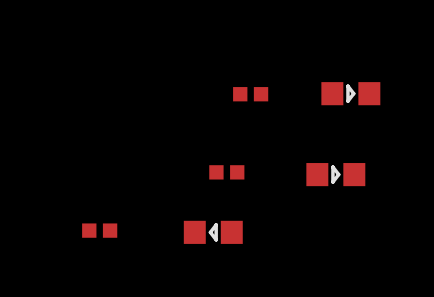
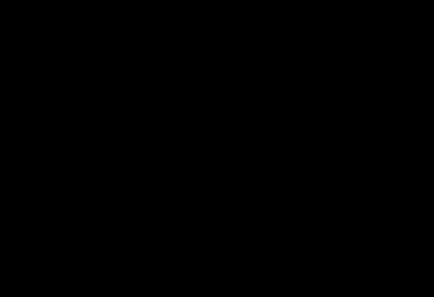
part: (350, 93) -> none
part: (250, 94) -> none
part: (226, 172) -> none
part: (335, 174) -> none
part: (99, 230) -> none
part: (213, 232) -> none

